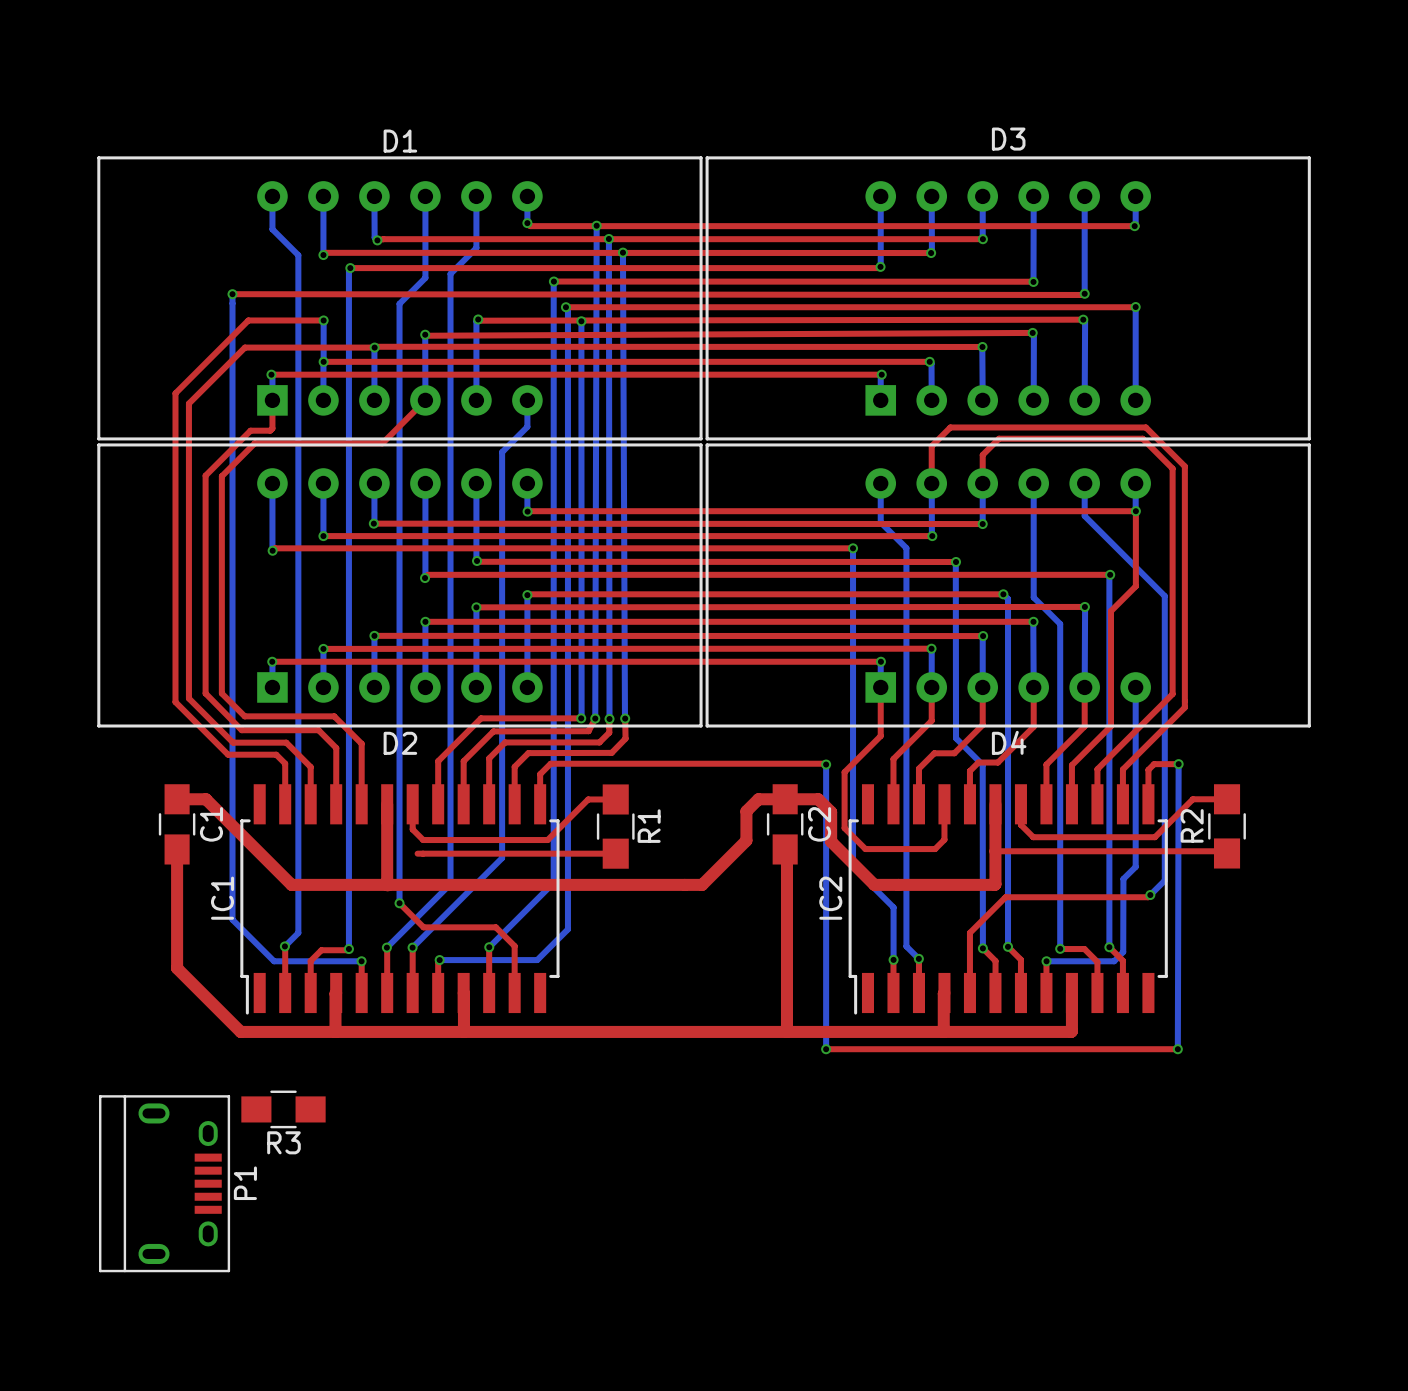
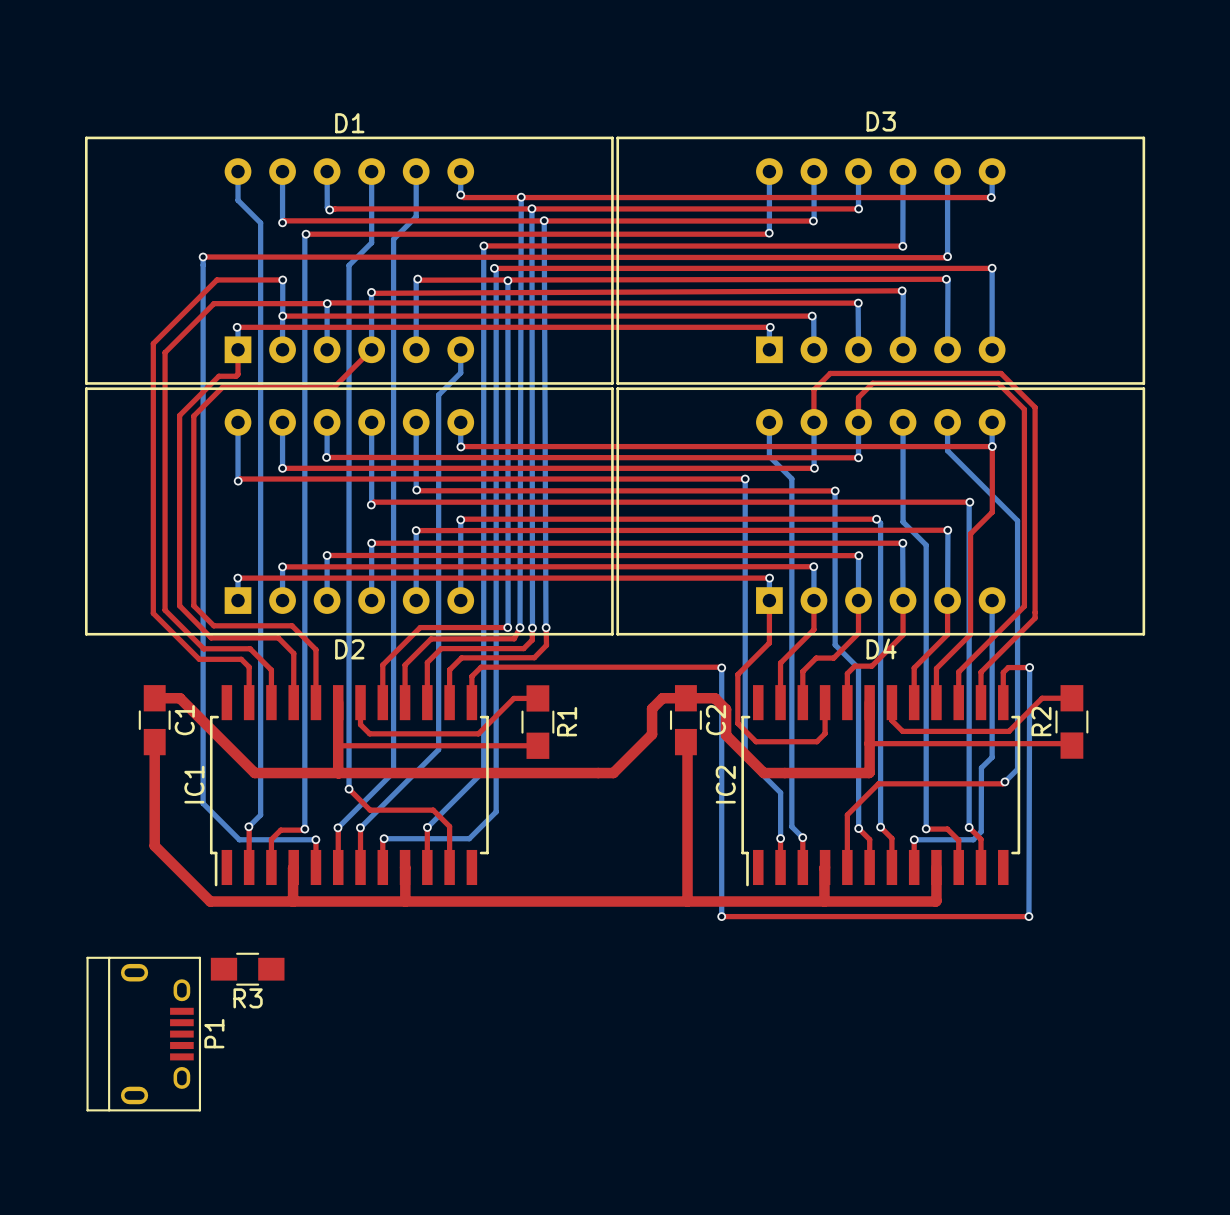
top track: none -> (339, 745) (364, 745)

